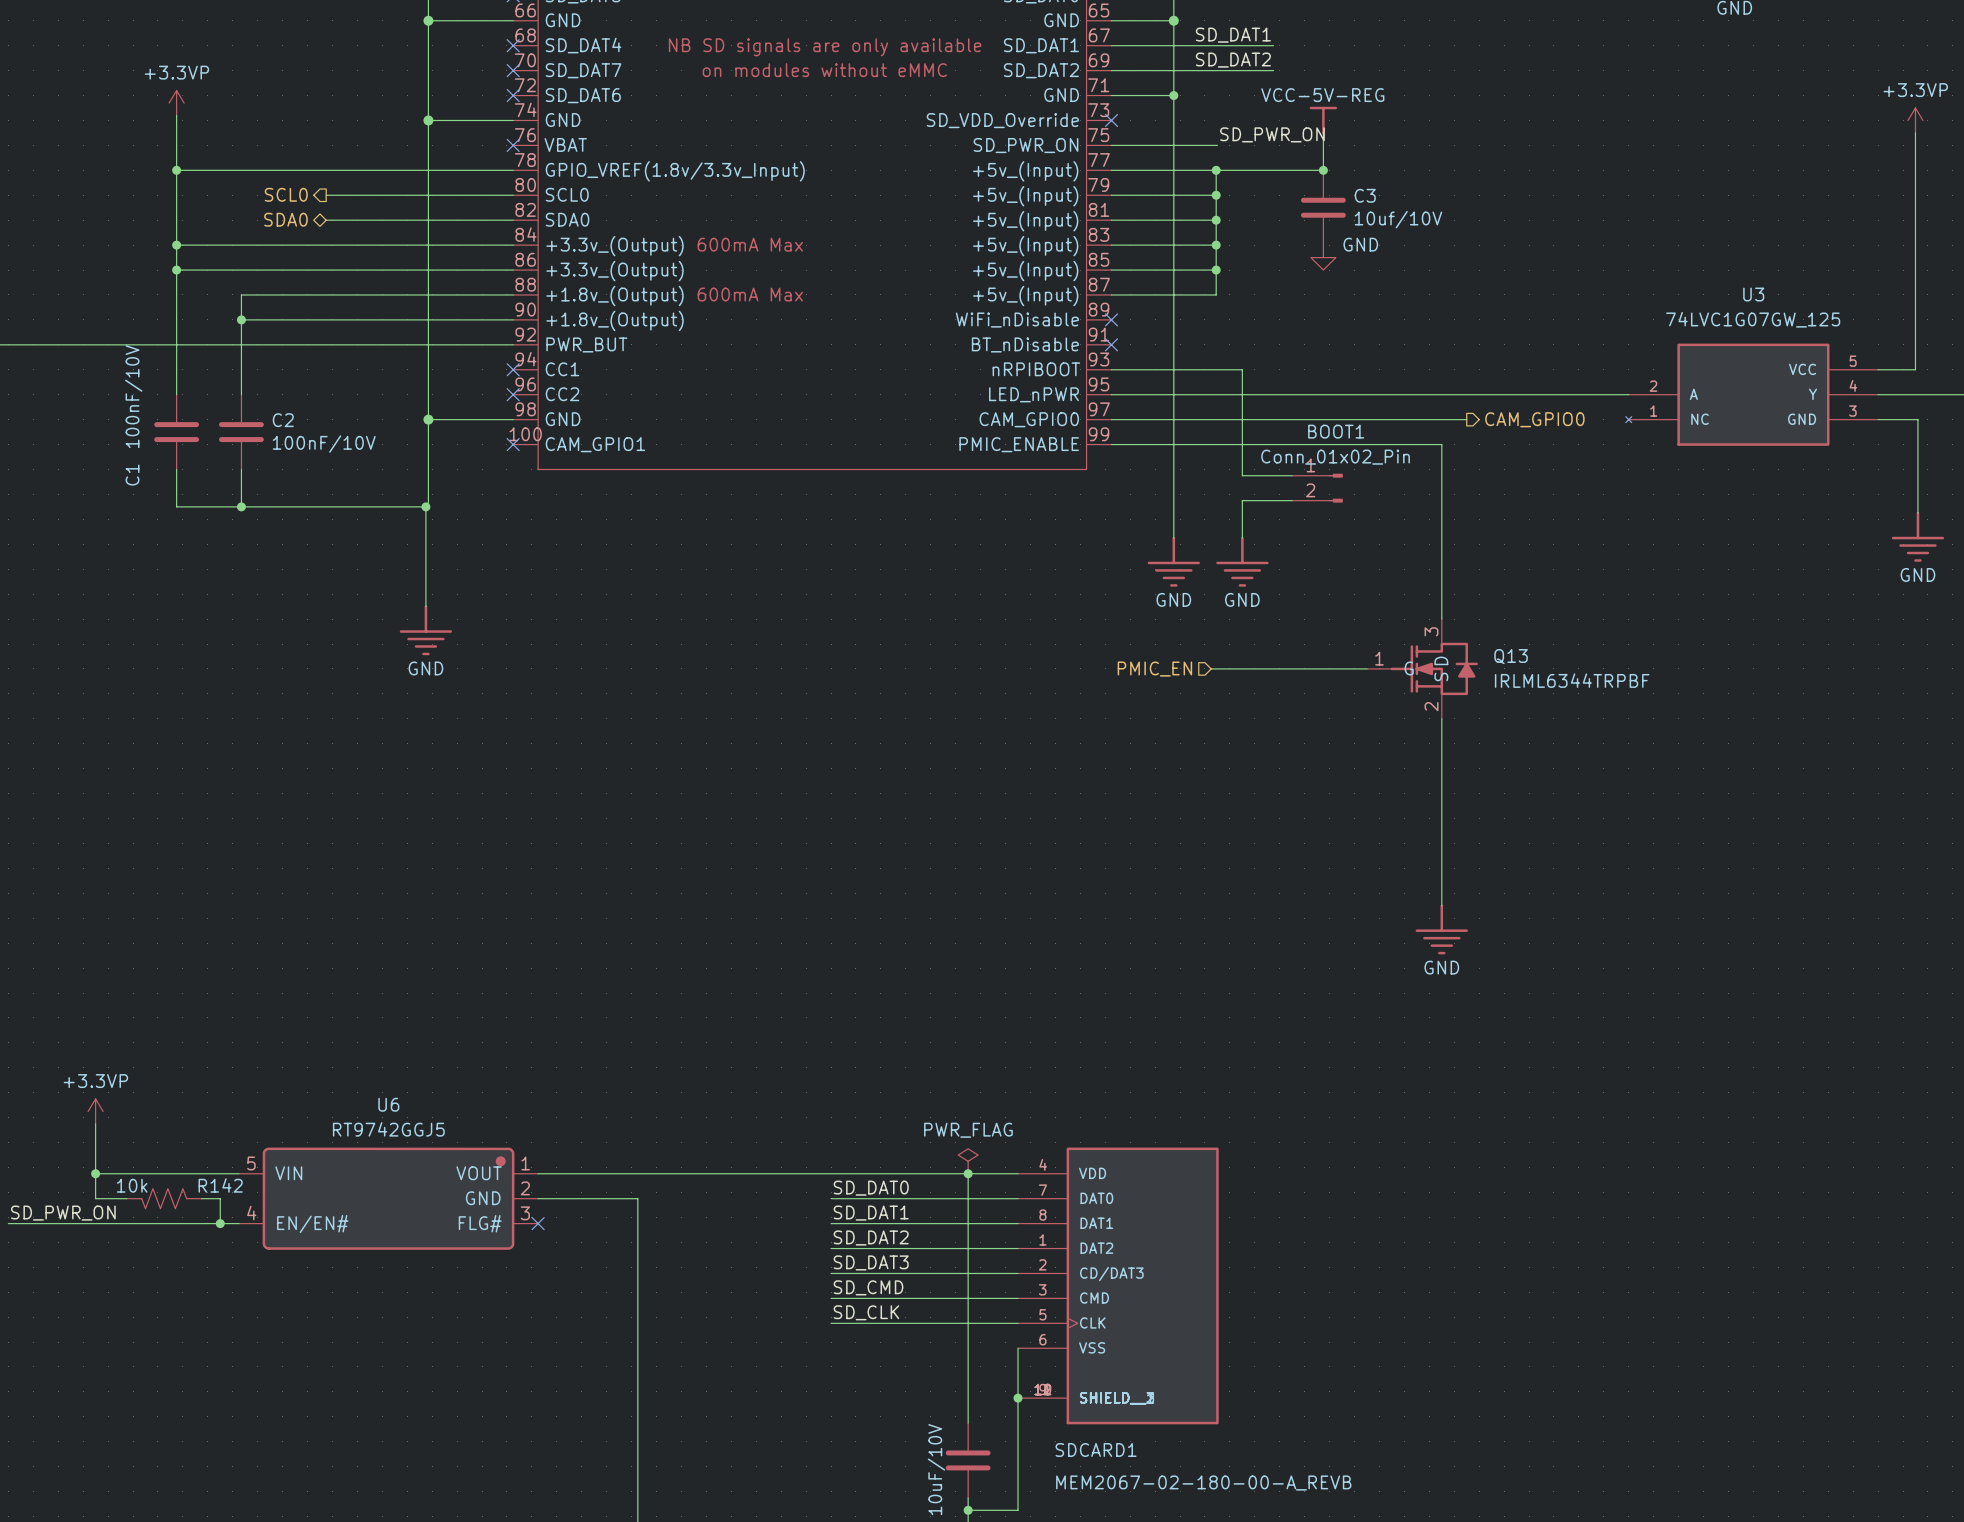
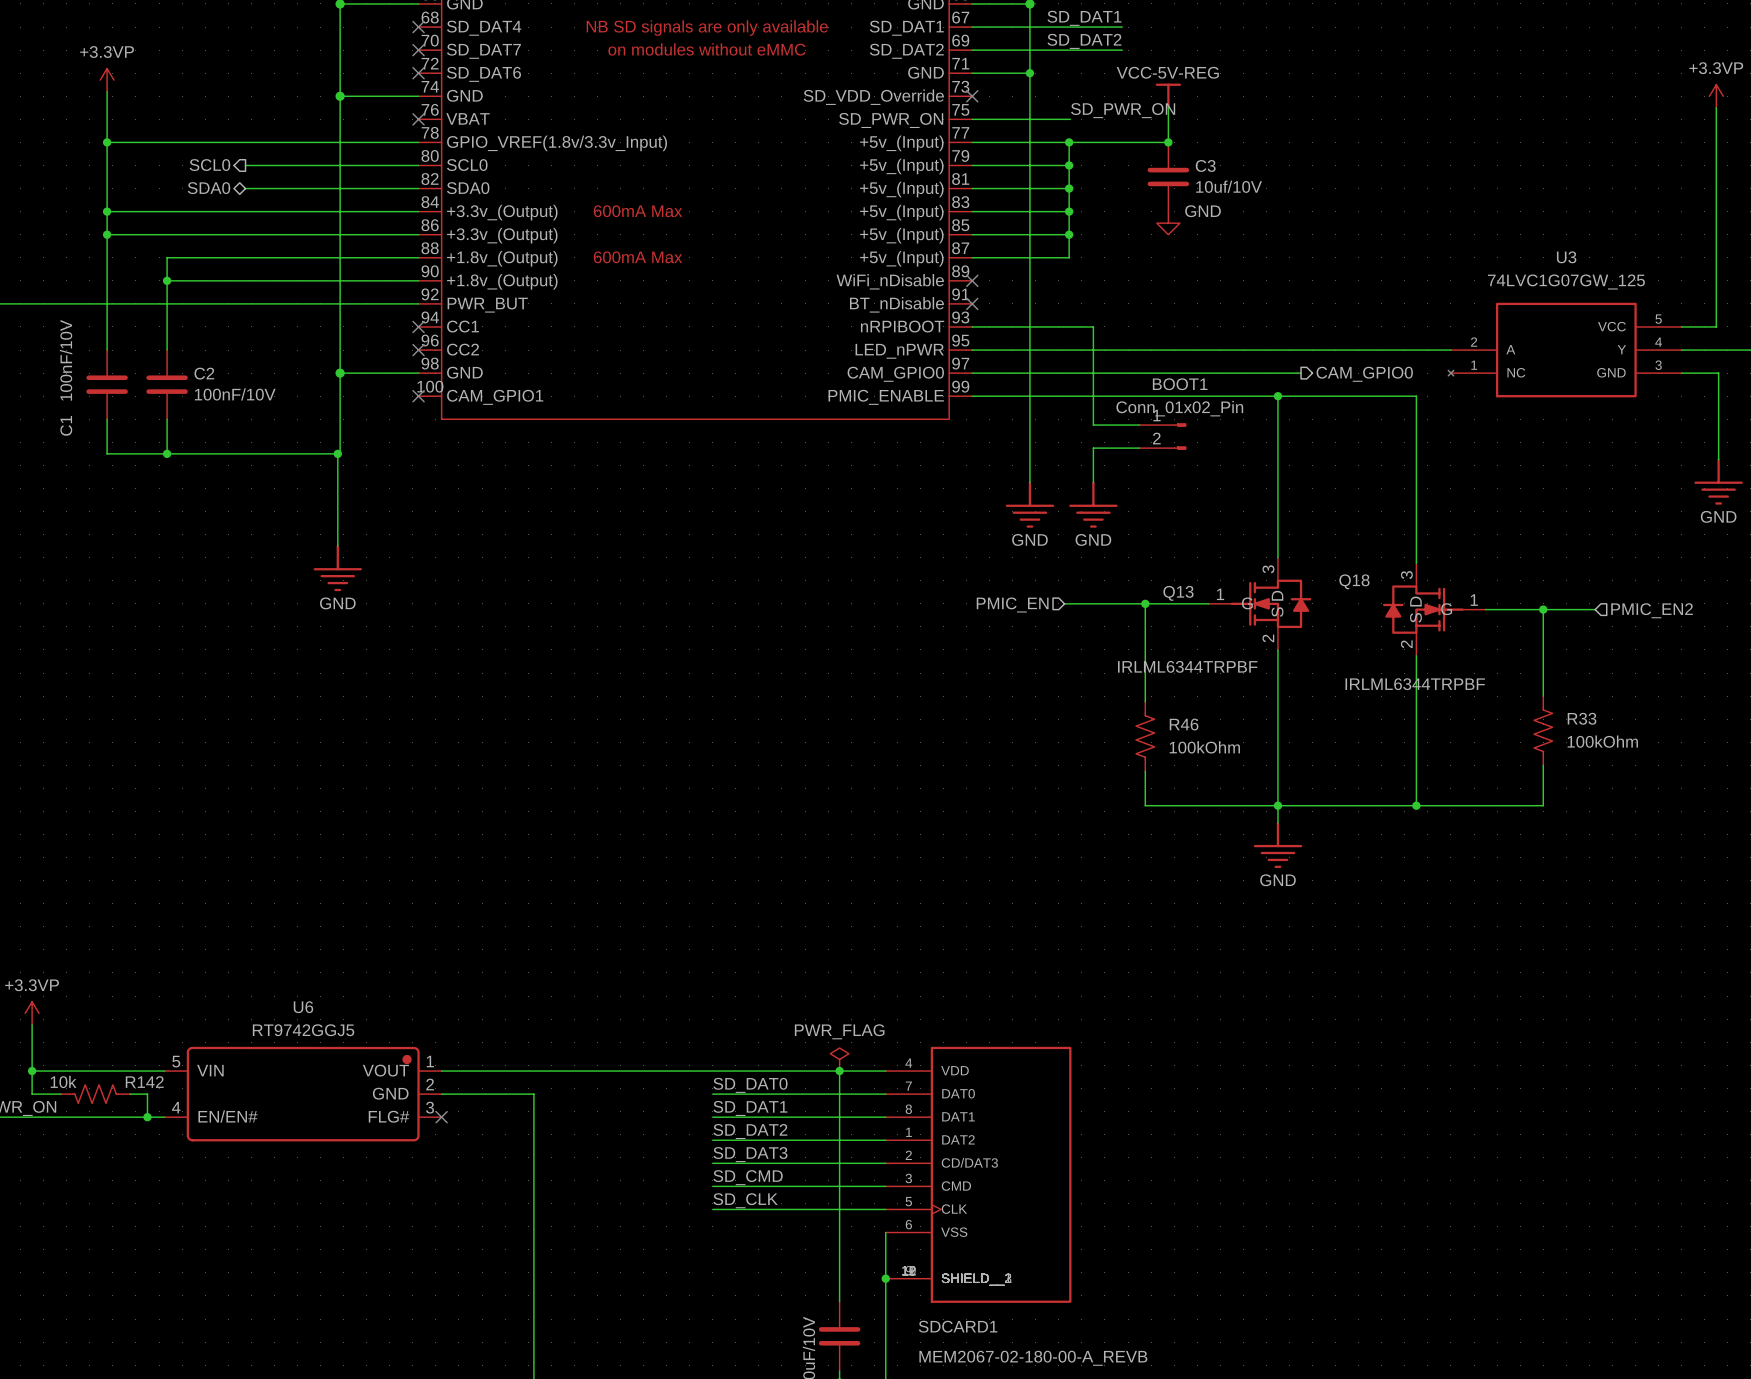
wire: none -> (1277, 396) (1416, 396) (1416, 563)
junction: none -> (1277, 396)
Q13 name position: Q13 (1511, 656) -> Q13 (1178, 593)
wire: none -> (1145, 603) (1145, 701)
junction: none -> (1145, 603)
Q18: none -> IRLML6344TRPBF (1434, 609)
wire: none -> (1485, 609) (1595, 609)
wire: none -> (1543, 609) (1543, 696)
junction: none -> (1543, 609)
hierarchical label: none -> PMIC_EN2 (1652, 610)
Q13 value position: IRLML6344TRPBF (1572, 680) -> IRLML6344TRPBF (1187, 666)
wire: none -> (1416, 655) (1416, 805)
R33: none -> 100kOhm (1543, 730)
R46: none -> 100kOhm (1145, 736)
wire: none -> (1543, 765) (1543, 805) (1145, 805) (1145, 771)
junction: none -> (1277, 805)
junction: none -> (1416, 805)

